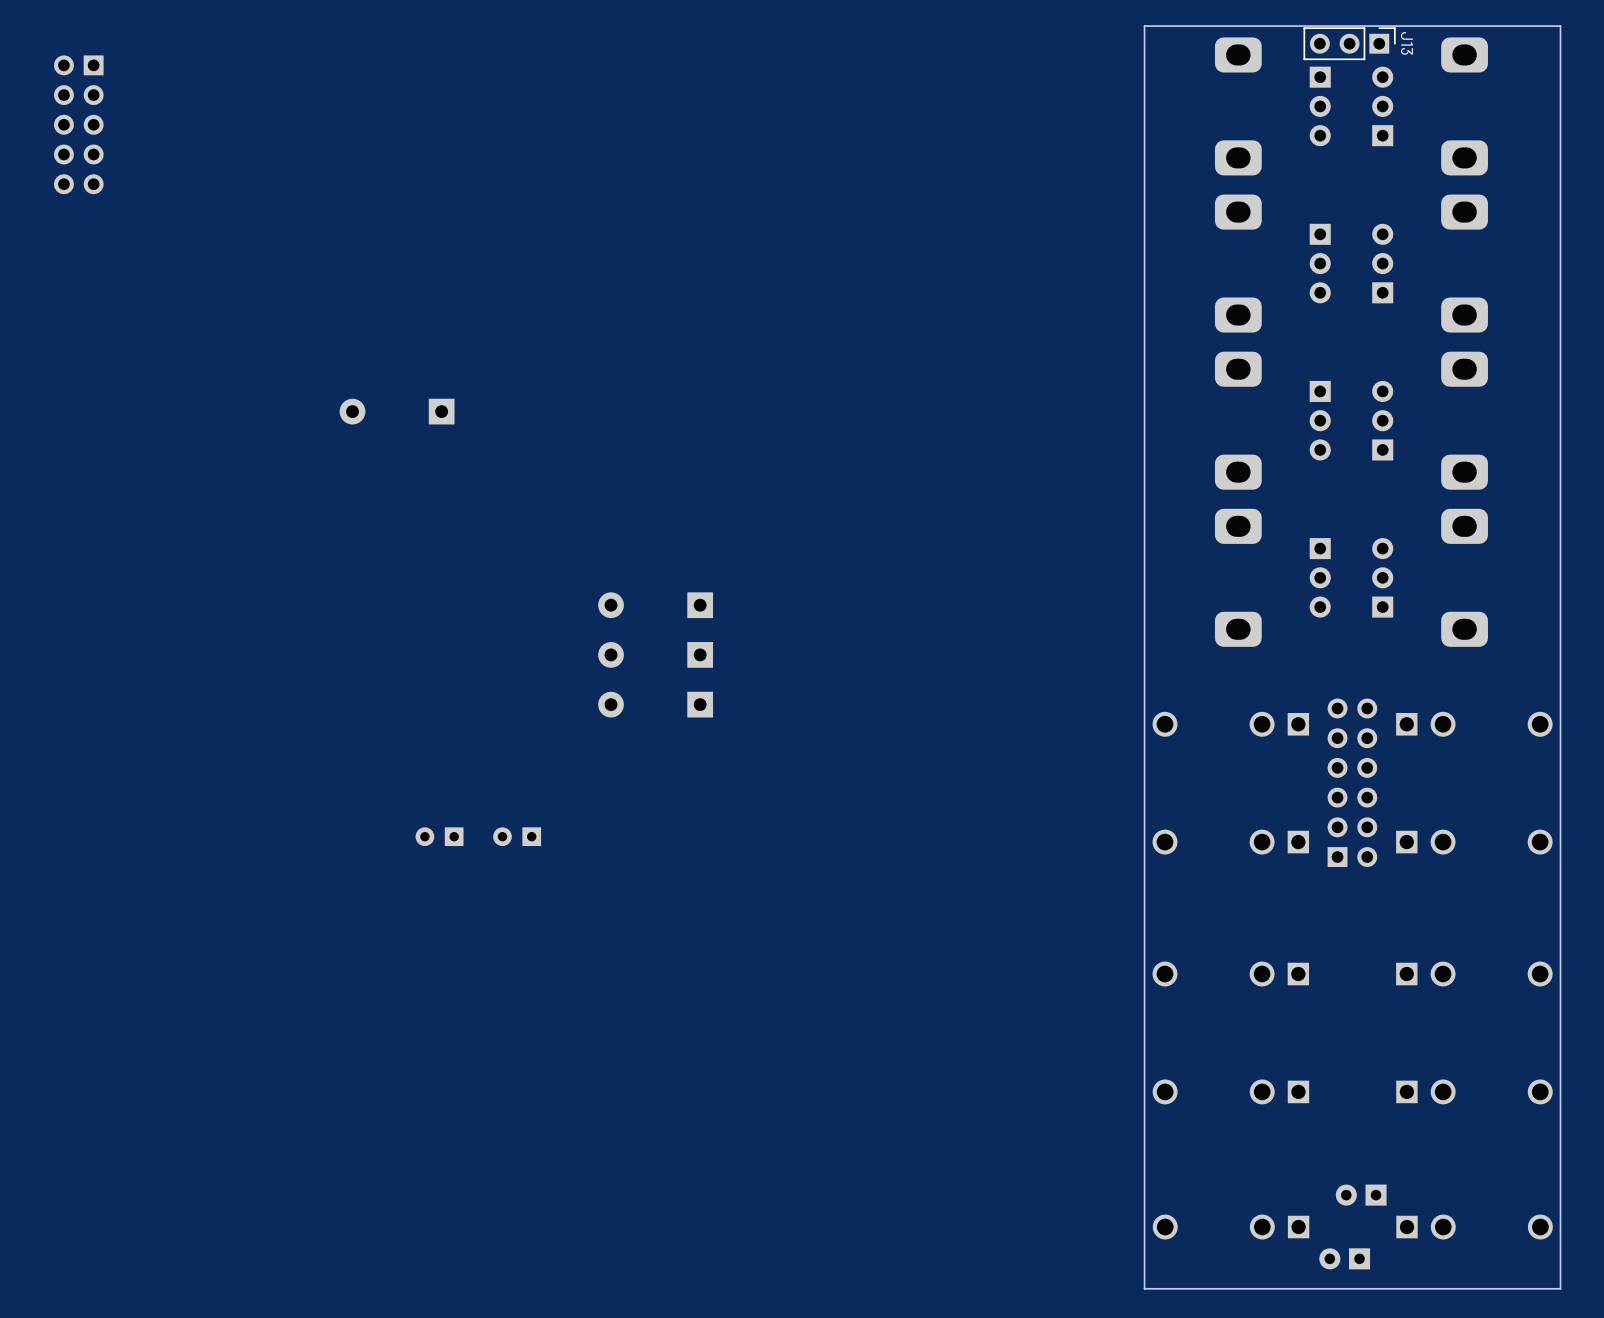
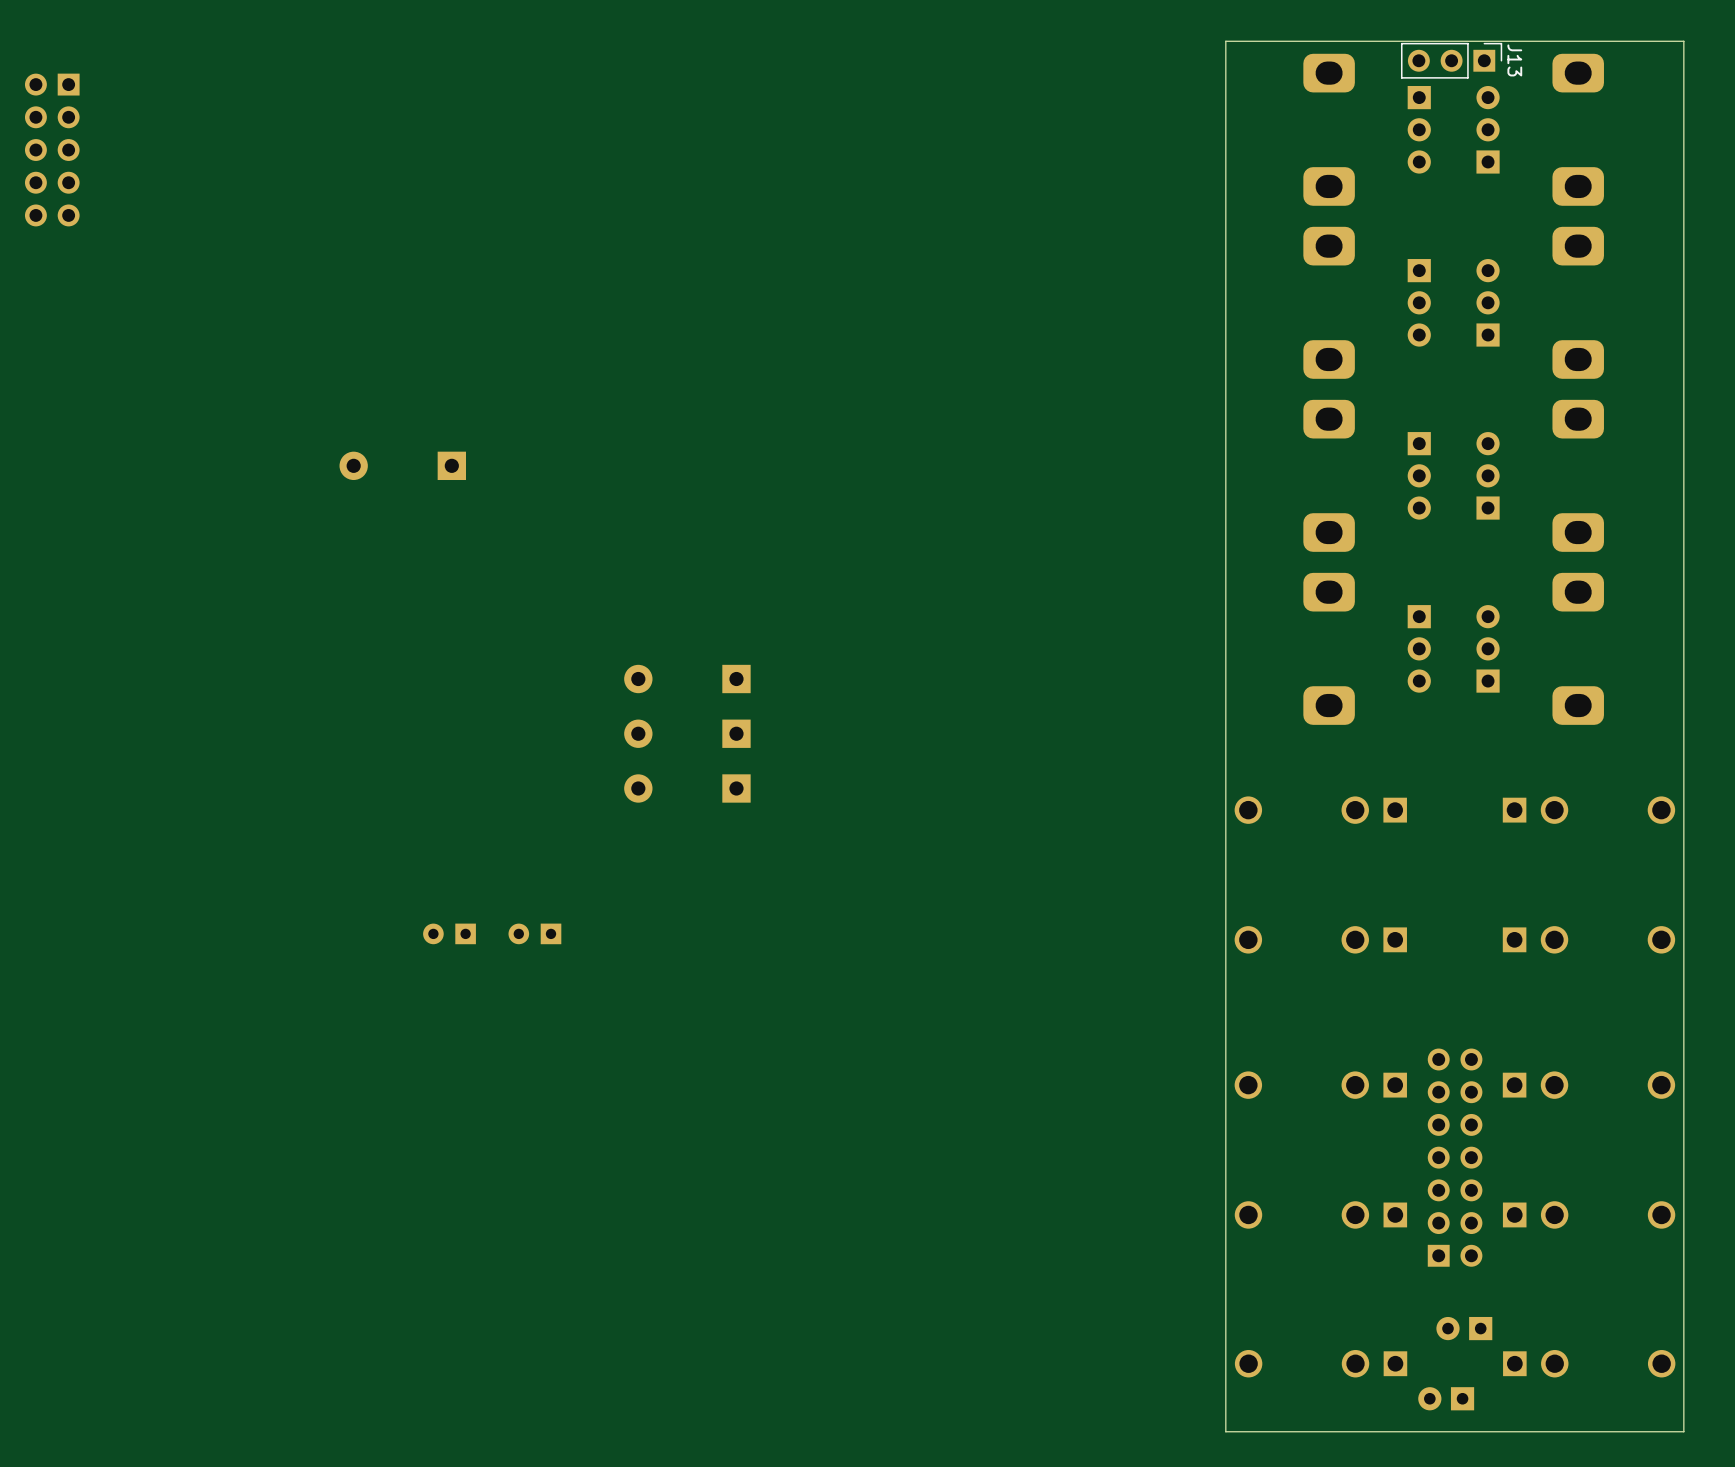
part: (1352, 782) -> none
part: none -> (1455, 1157)

